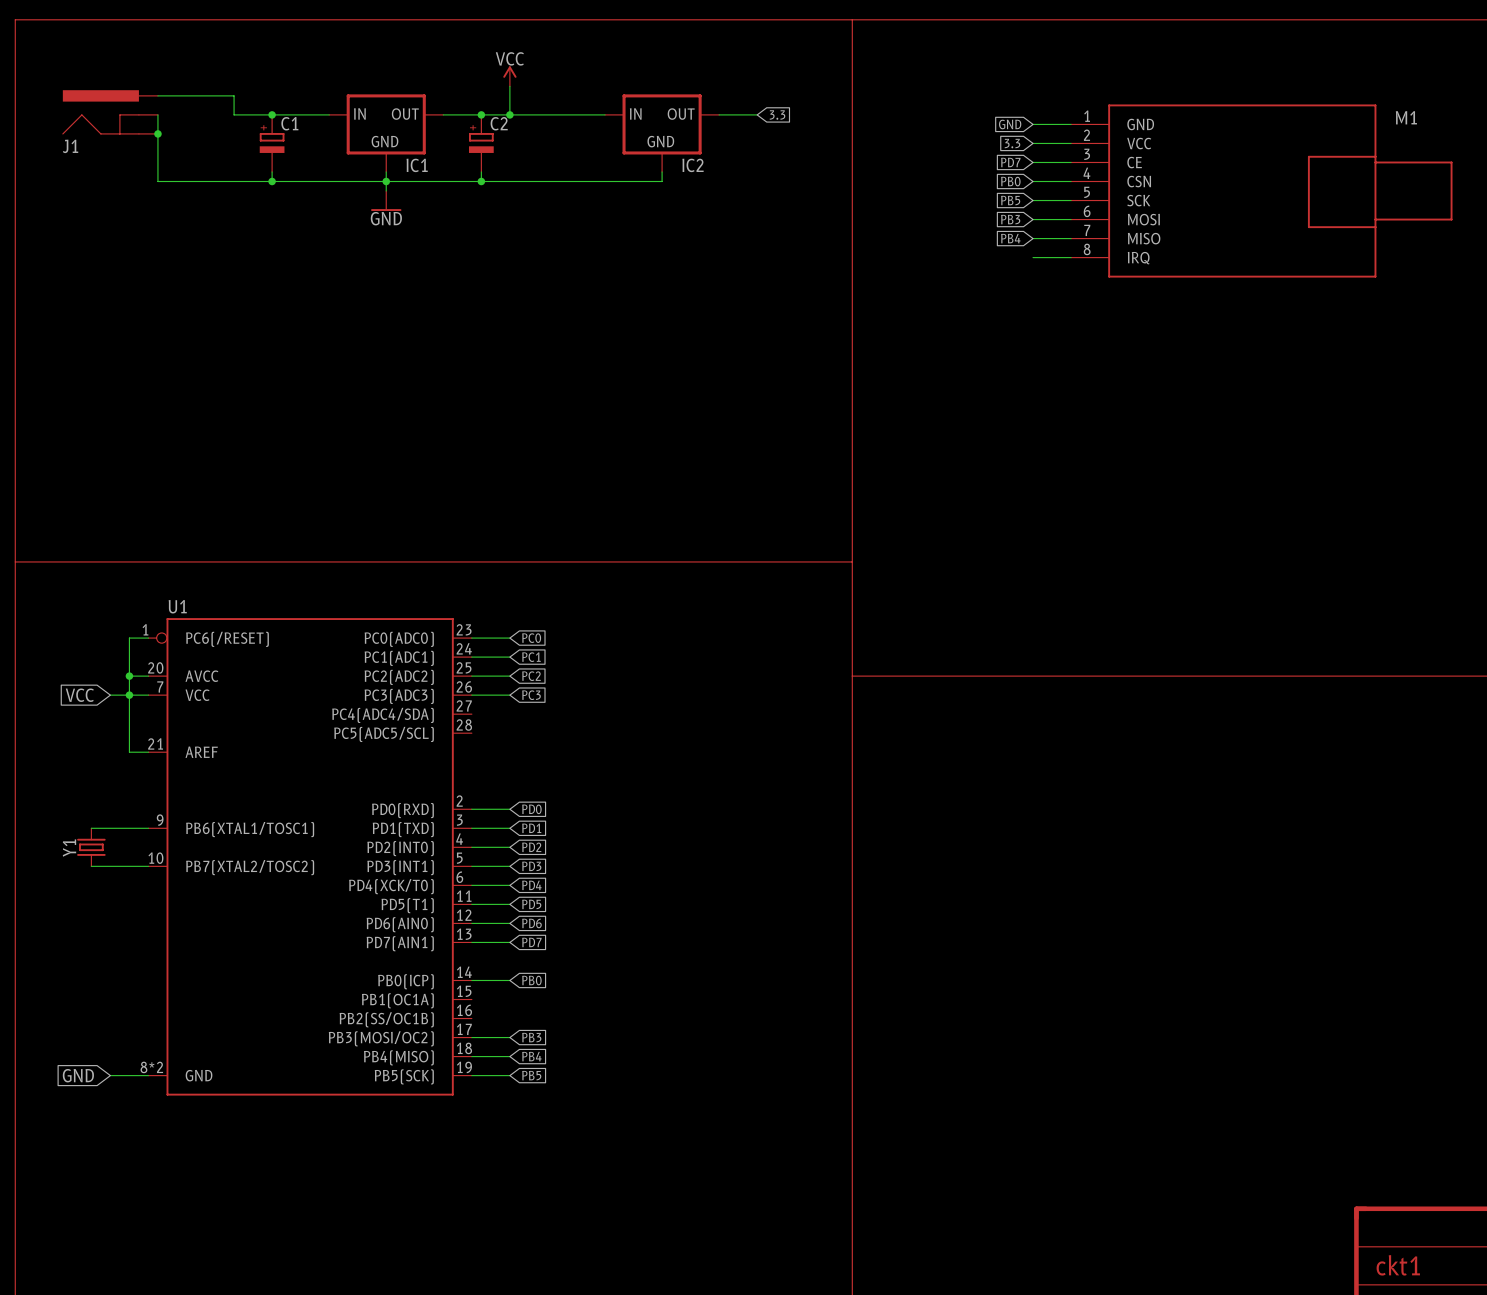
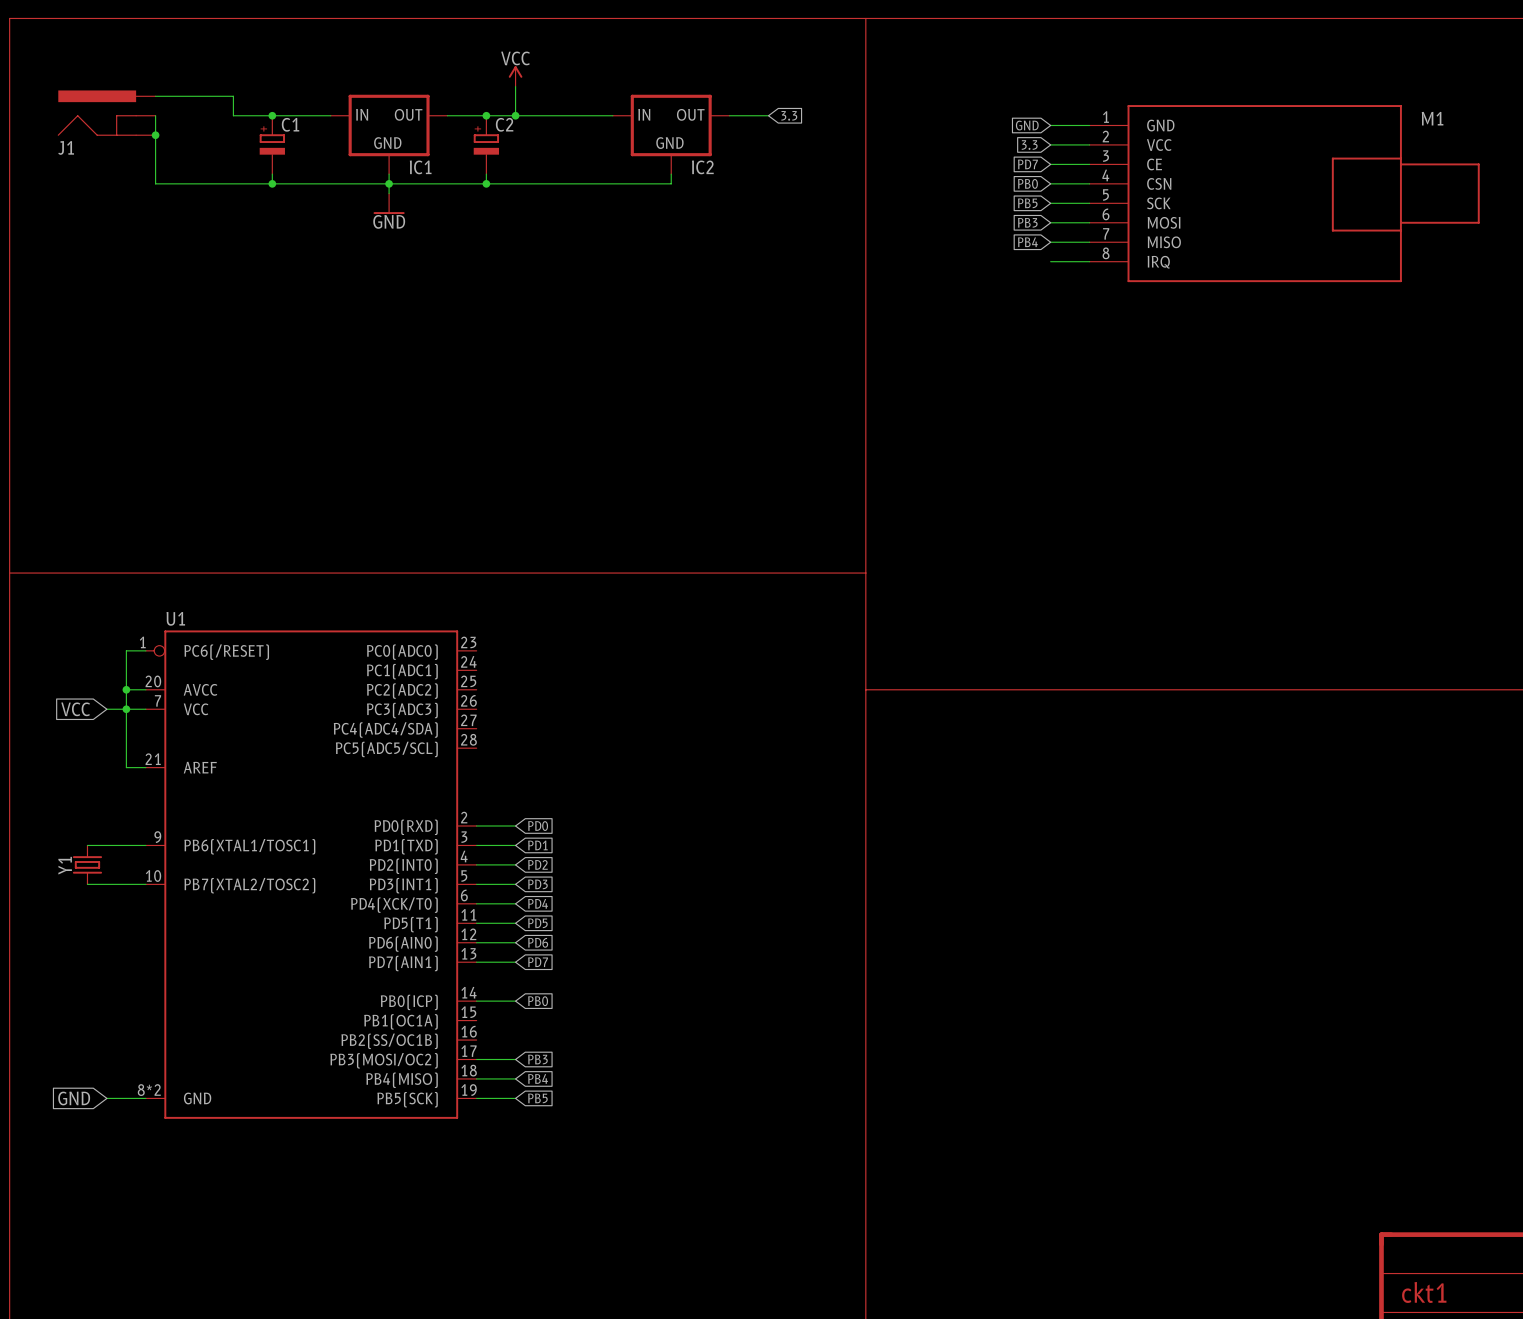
wire: (471, 638) (509, 638) -> none
global label: PC0 (531, 638) -> none
wire: (471, 657) (509, 657) -> none
global label: PC1 (531, 657) -> none
wire: (471, 676) (509, 676) -> none
global label: PC2 (531, 676) -> none
wire: (471, 695) (509, 695) -> none
global label: PC3 (531, 695) -> none

